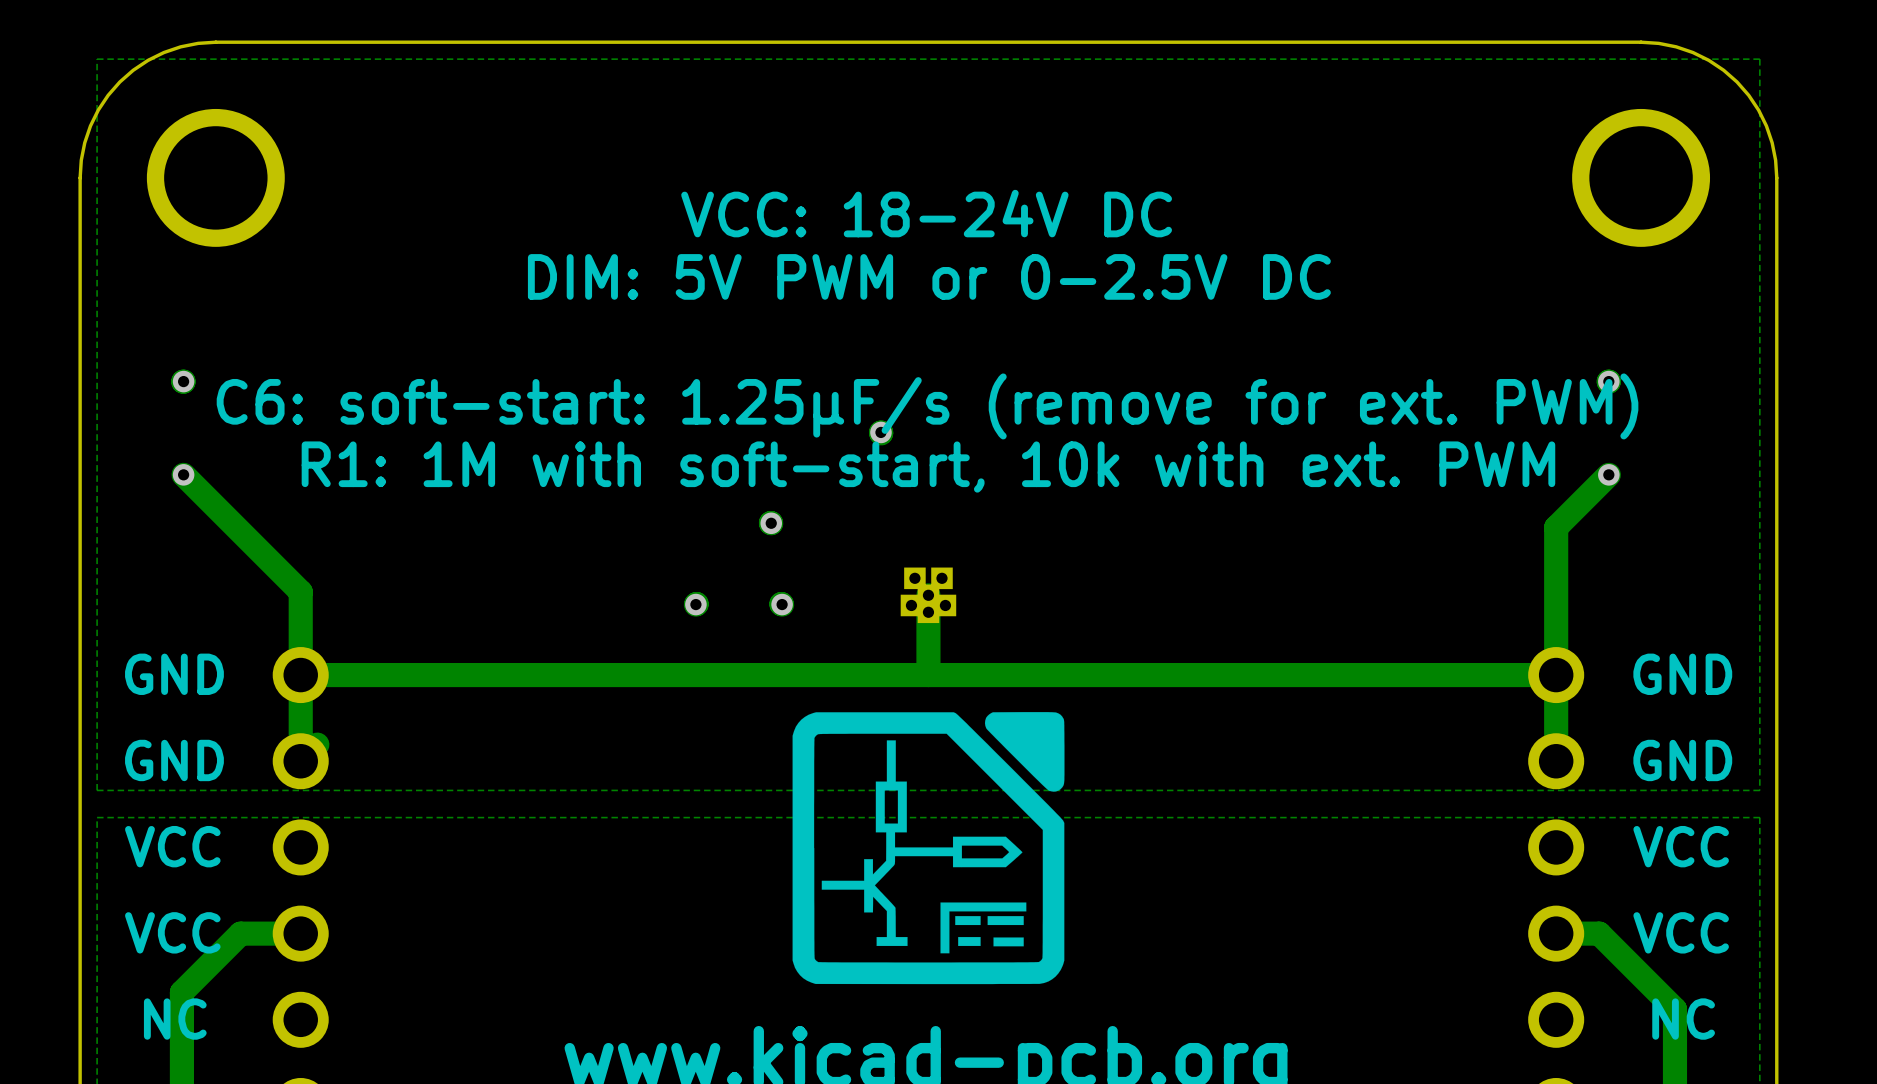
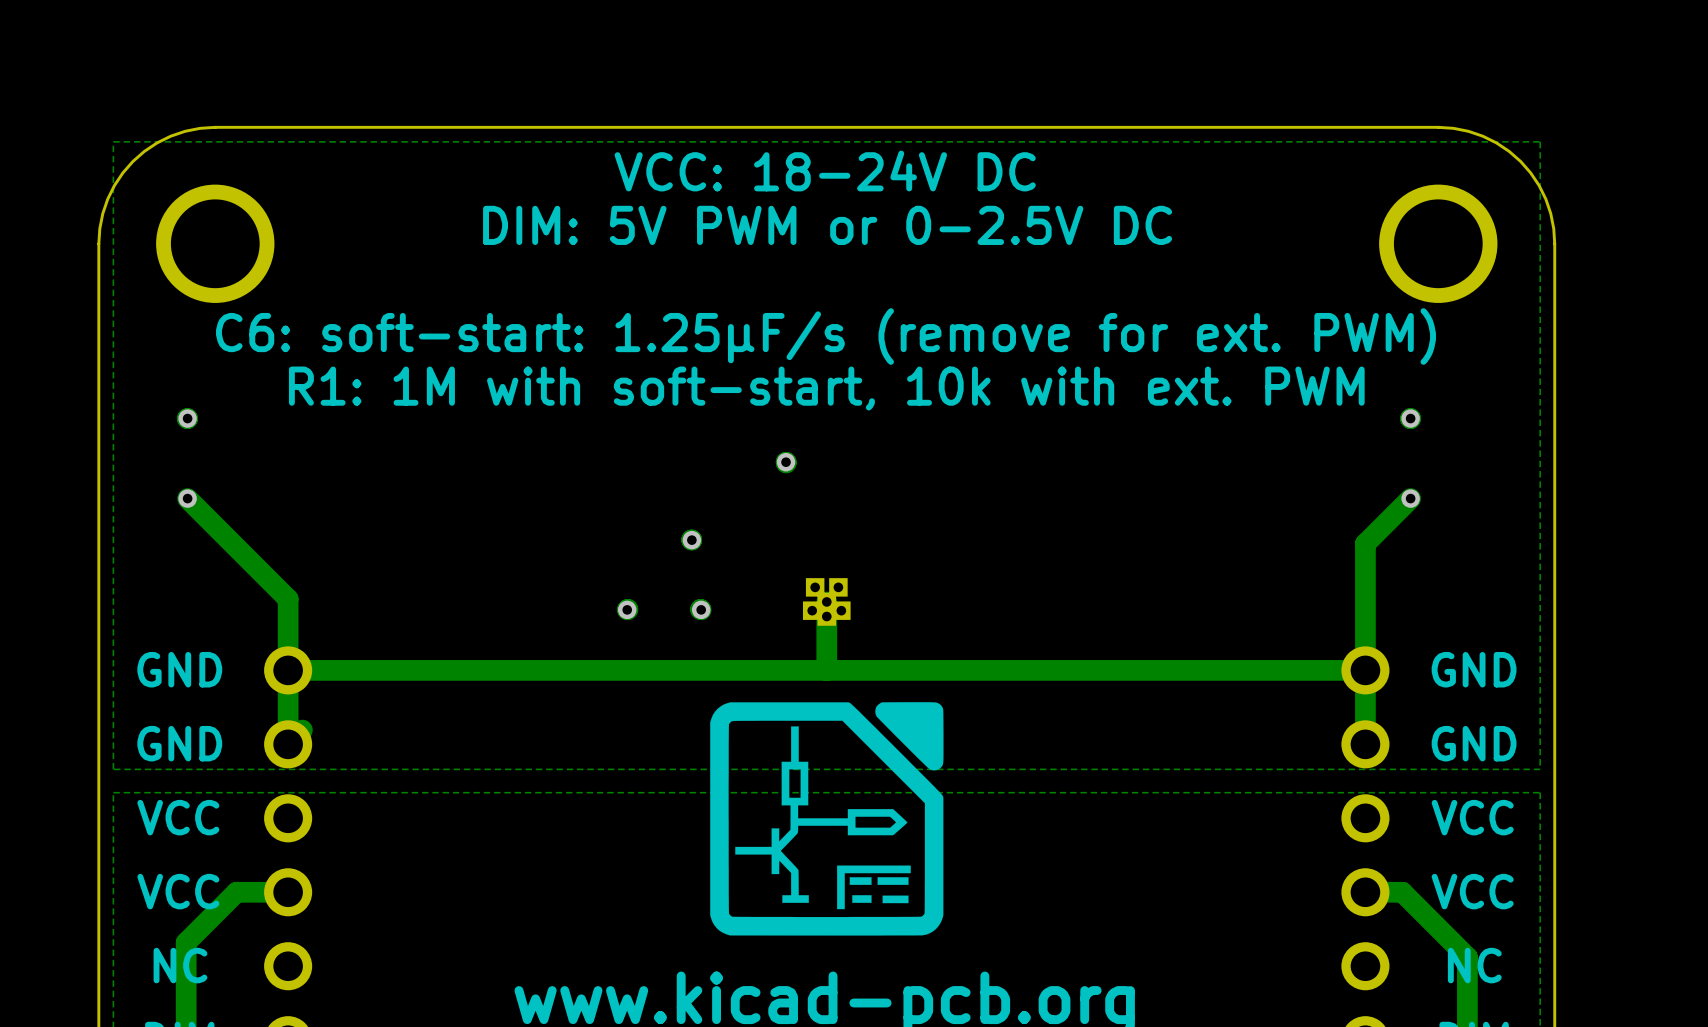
text position: VCC: 18-24V DC (926, 213) -> VCC: 18-24V DC (825, 171)
text position: DIM: 5V PWM or 0-2.5V DC (929, 276) -> DIM: 5V PWM or 0-2.5V DC (827, 225)
text position: C6: soft-start: 1.25µF/s (remove for ext. PWM) (927, 406) -> C6: soft-start: 1.25µF/s (remove for ext. PWM) (825, 336)
text position: R1: 1M with soft-start, 10k with ext. PWM (928, 467) -> R1: 1M with soft-start, 10k with ext. PWM (826, 388)

